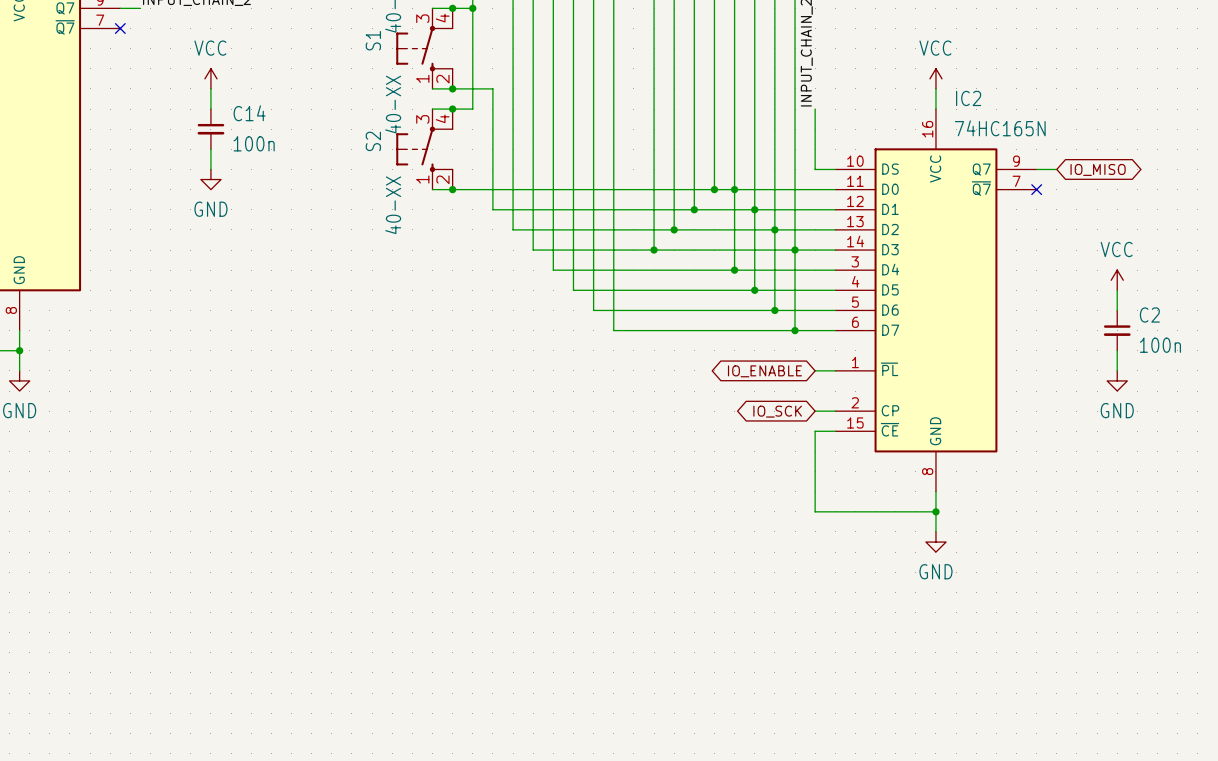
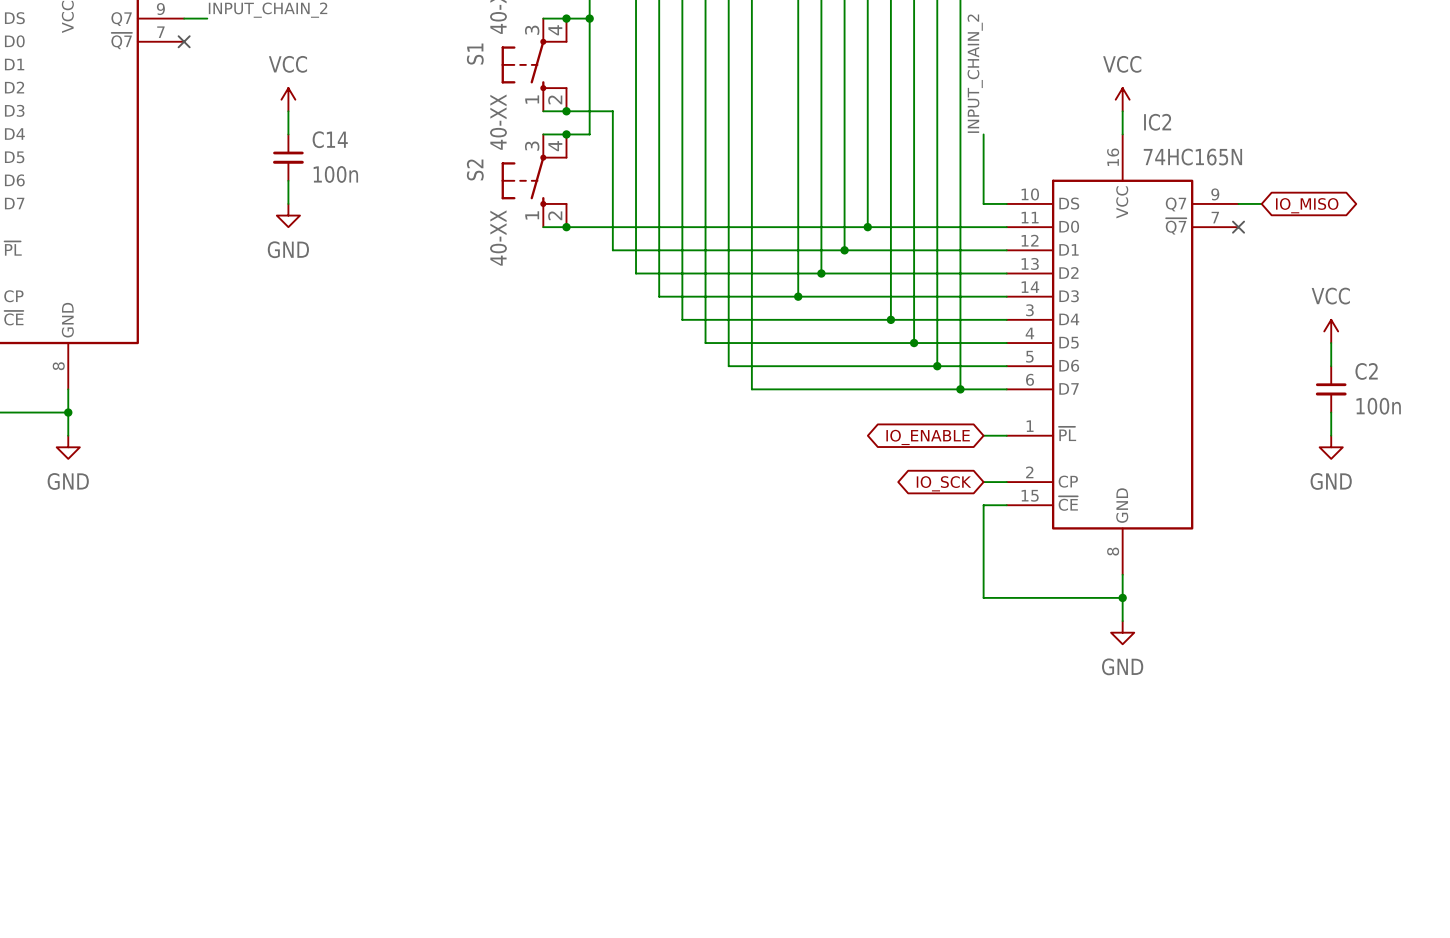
junction: (734, 189) -> none
junction: (754, 209) -> none
junction: (774, 229) -> none
junction: (795, 250) -> none

